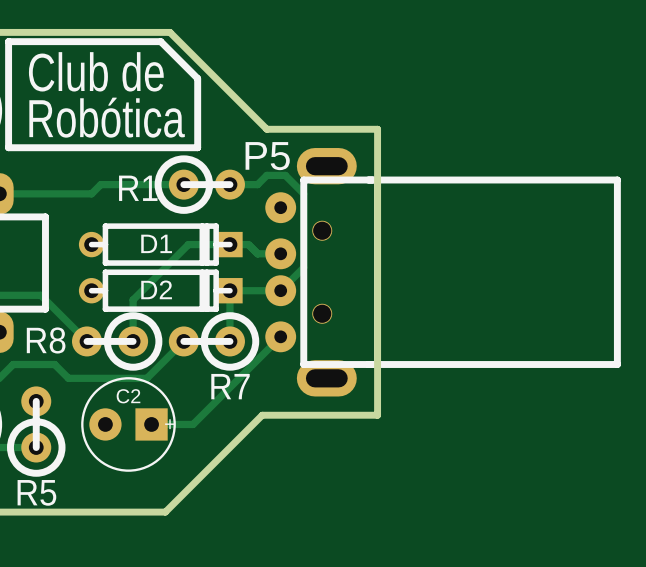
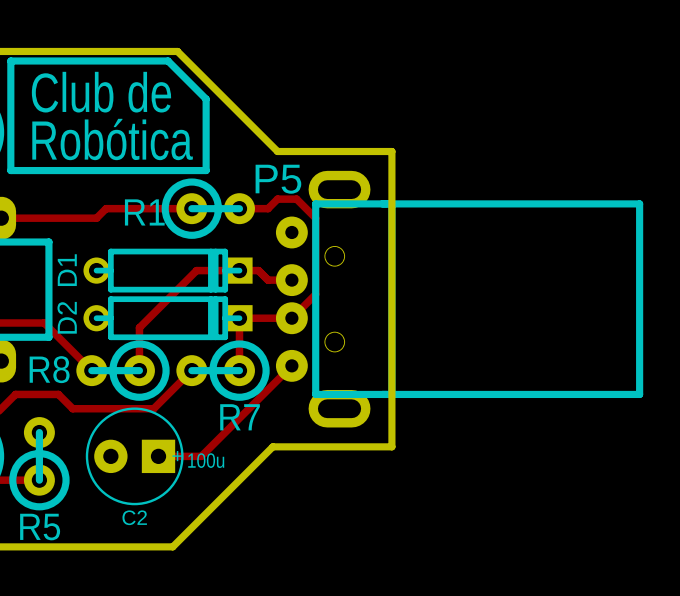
D1 name rotation: 0° (156, 243) -> 90° counterclockwise (67, 270)
D1 name position: D1 (156, 243) -> D1 (67, 270)
D2 name rotation: 0° (156, 289) -> 90° counterclockwise (67, 317)
D2 name position: D2 (156, 289) -> D2 (67, 317)
C2 name position: C2 (128, 396) -> C2 (134, 517)
C2 value: none -> 100u (206, 460)

